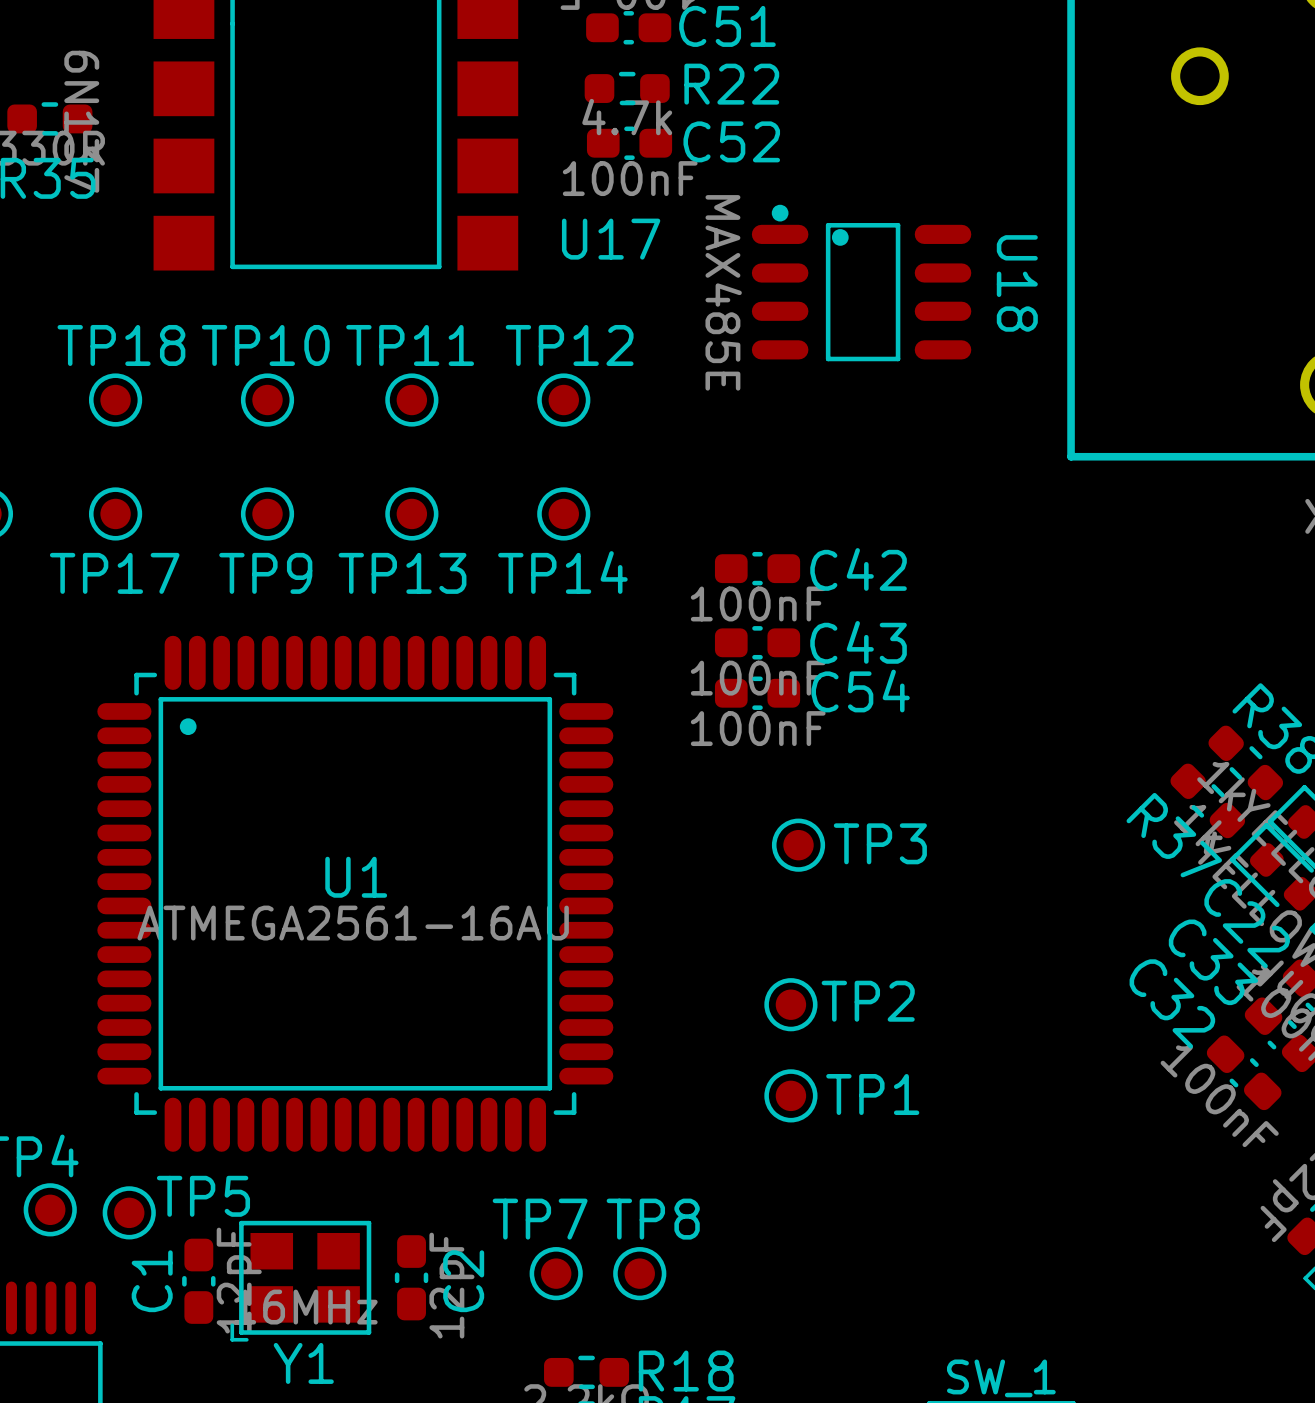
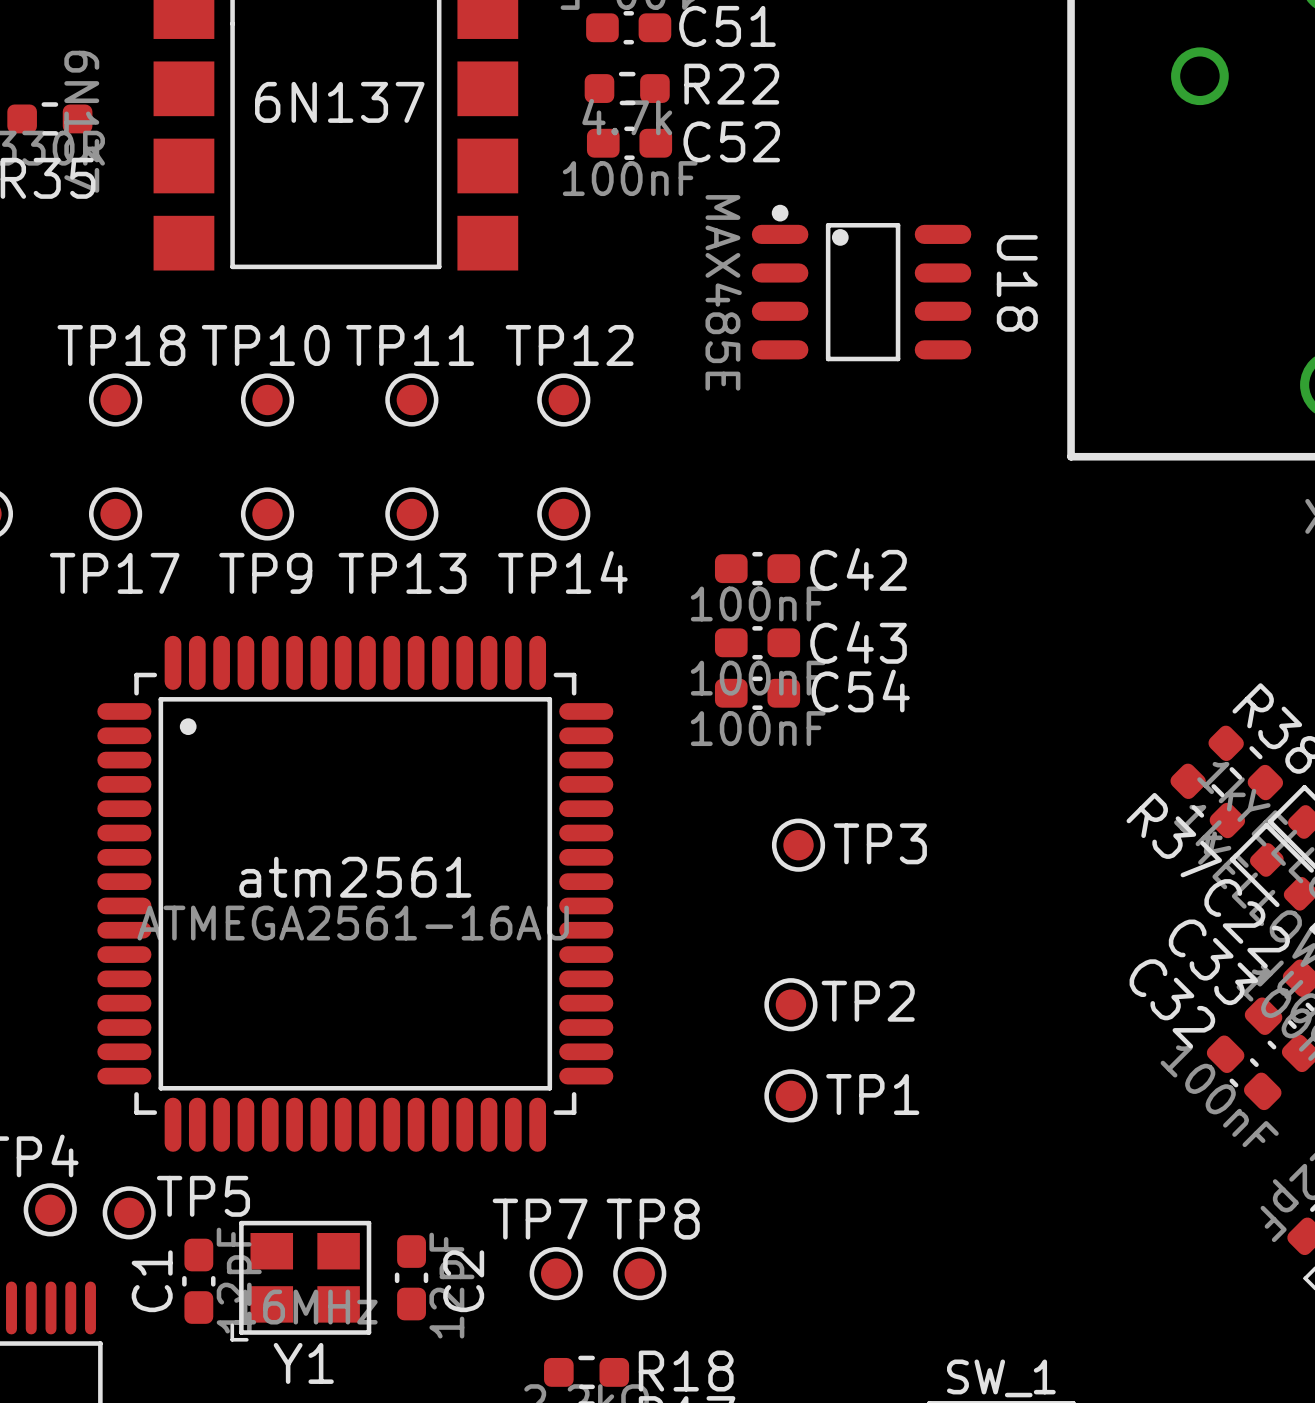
U17 name: U17 (611, 239) -> 6N137 (339, 102)
U1 name: U1 (356, 877) -> atm2561 (355, 877)

